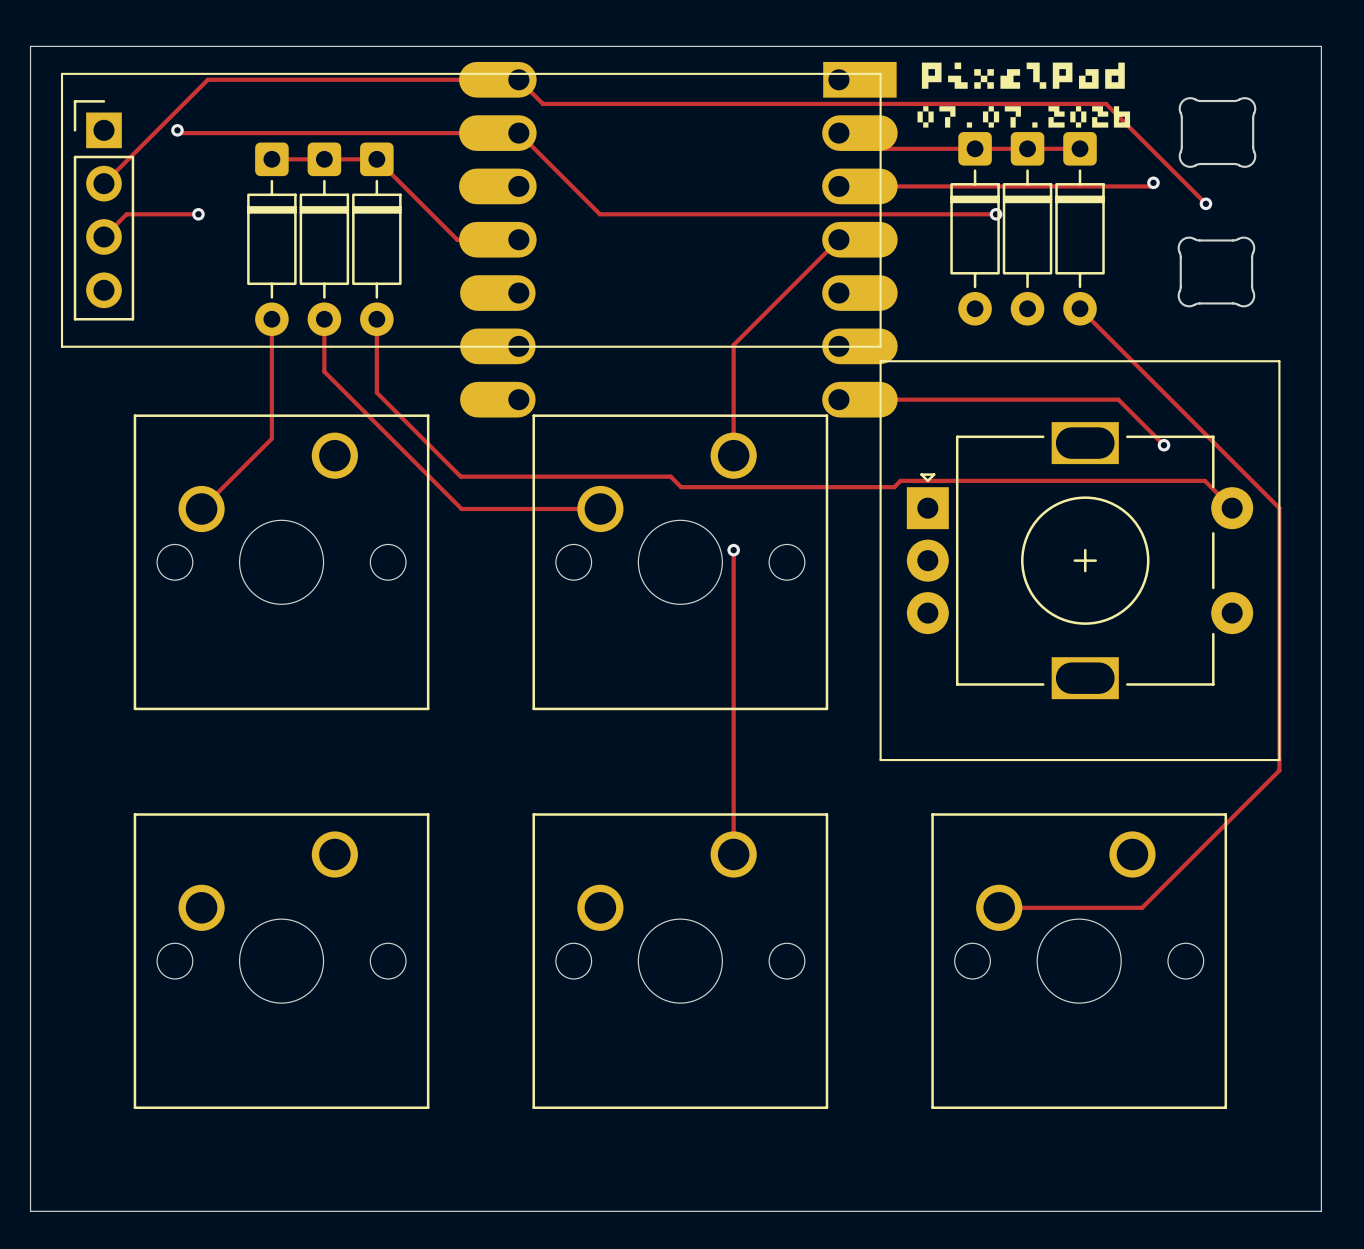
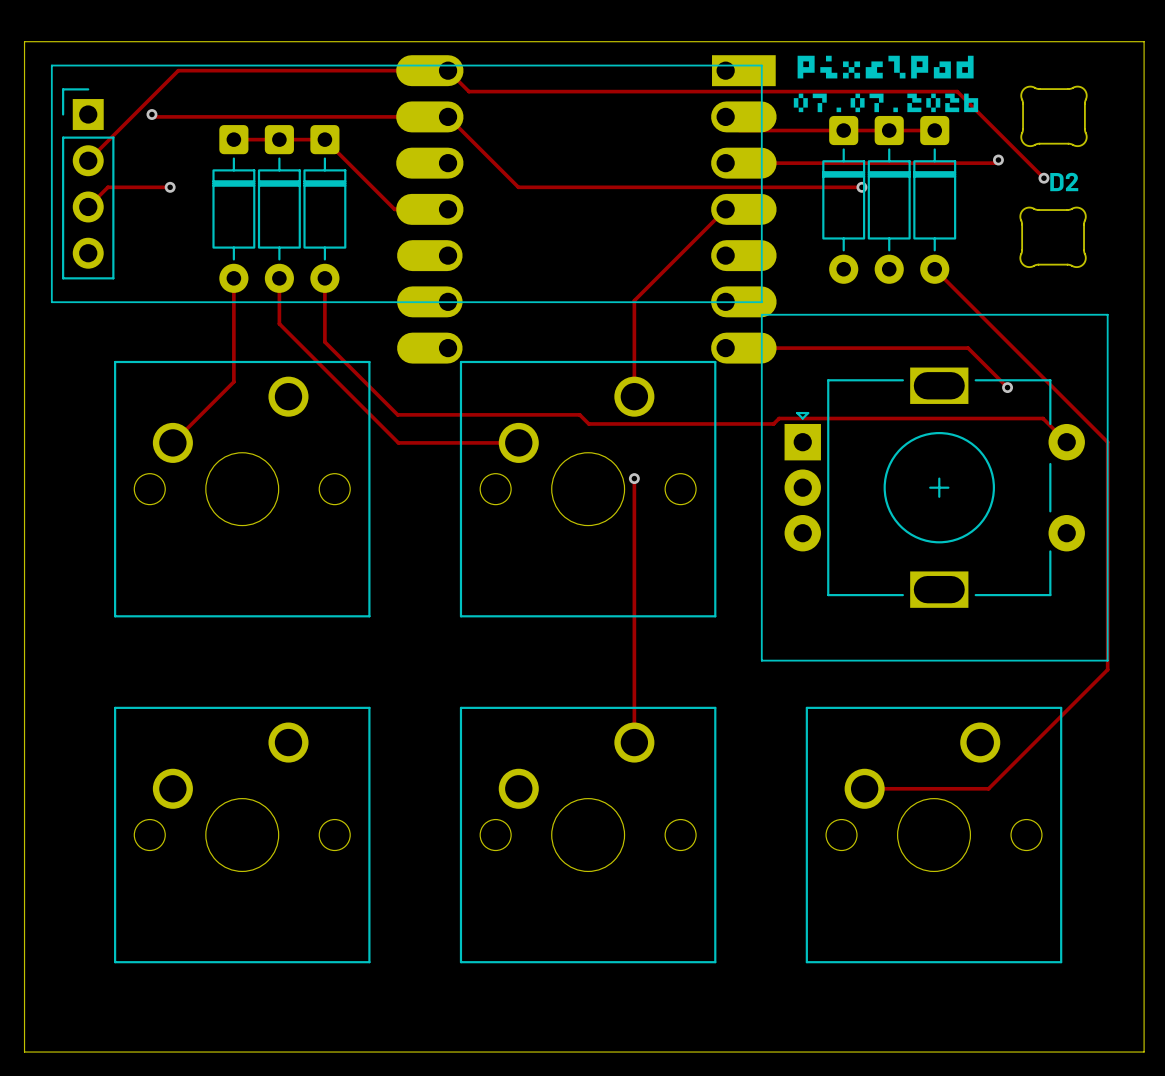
D2 name: none -> D2 (1064, 181)

